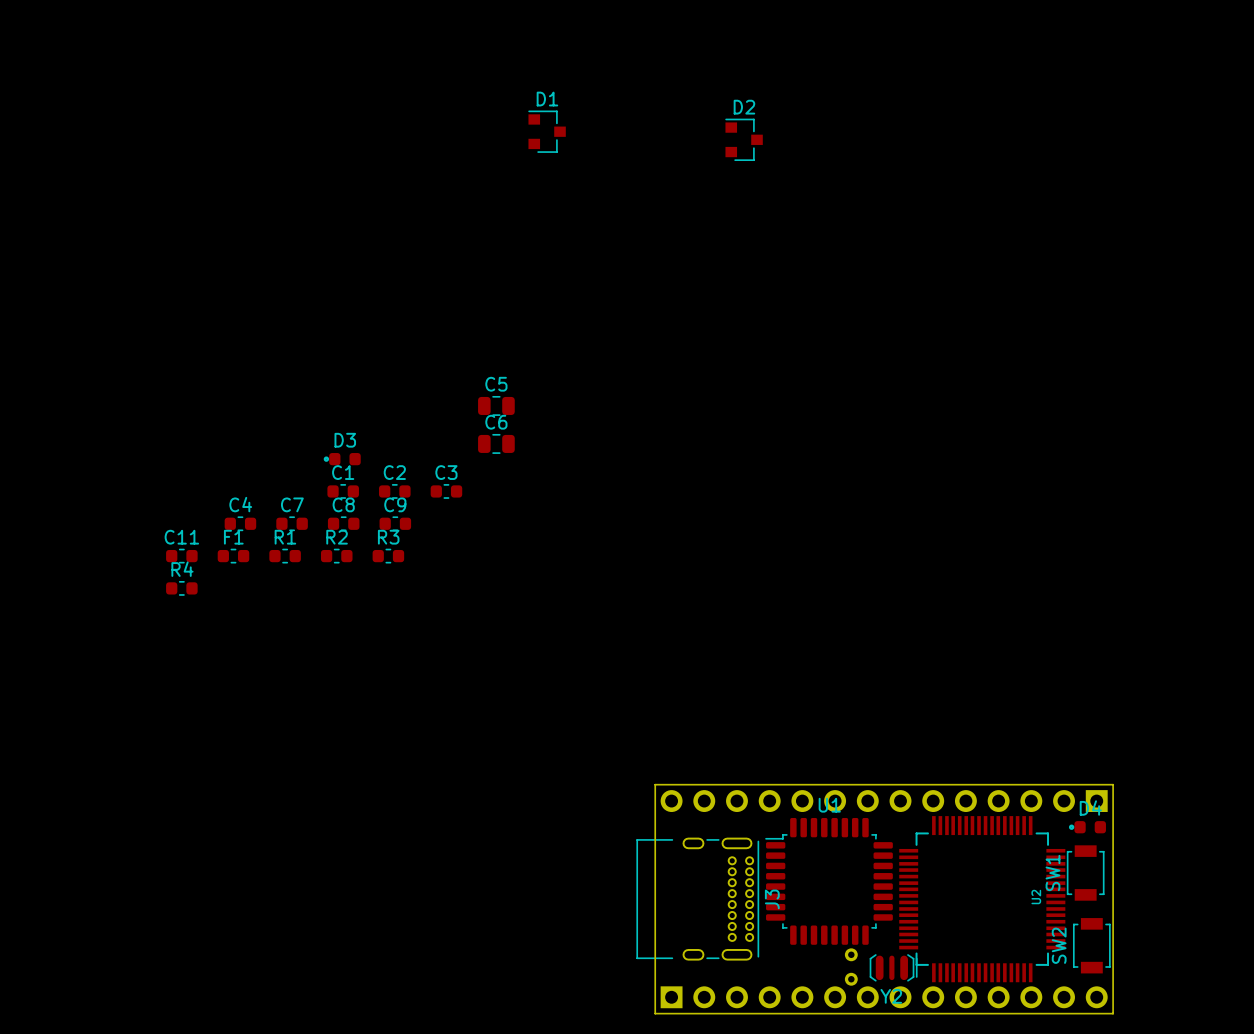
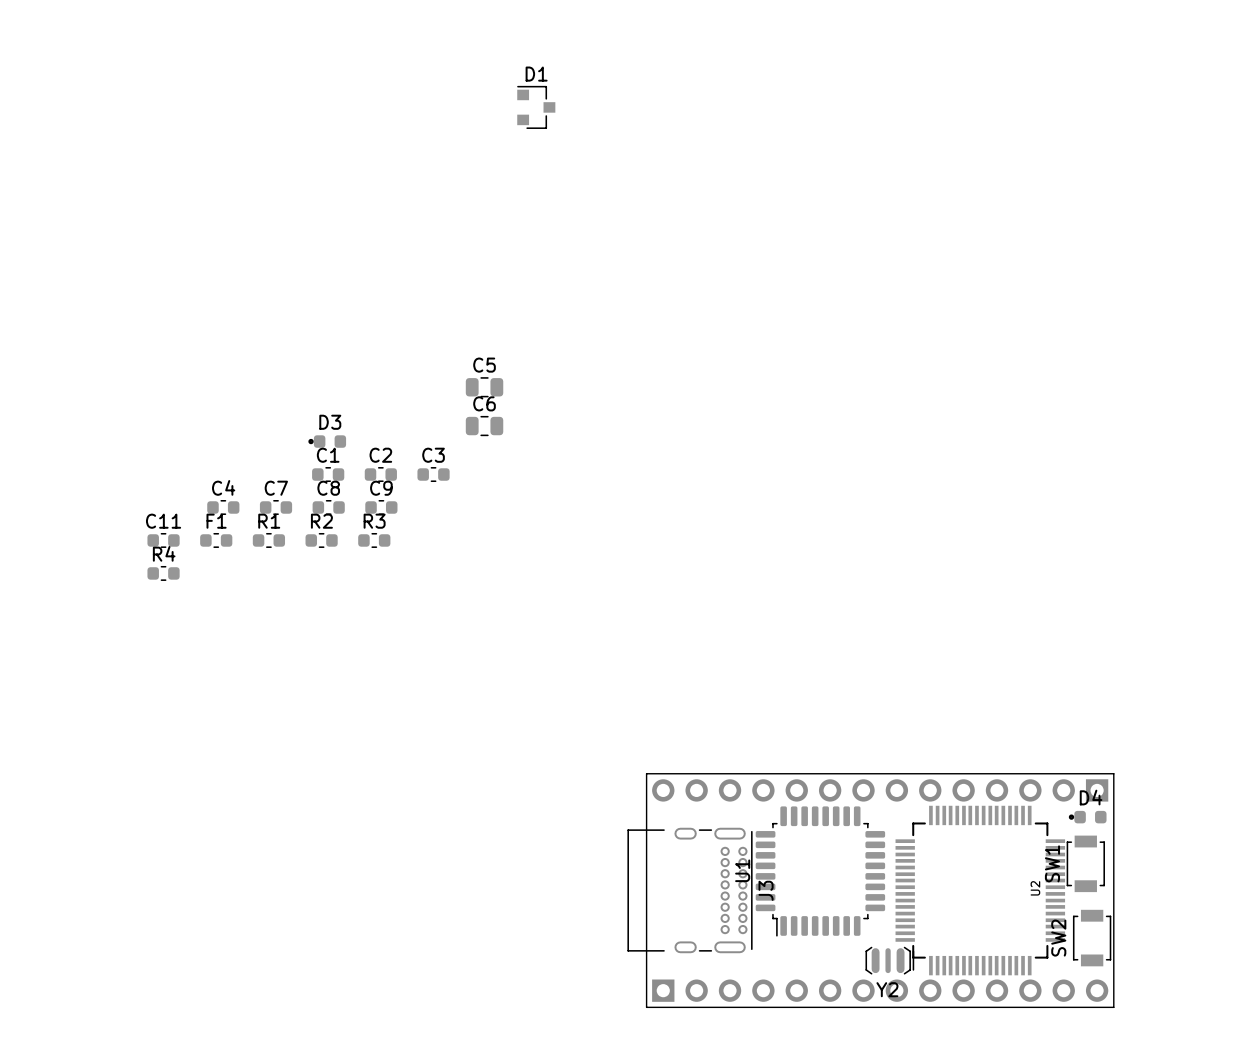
D2: (744, 139) -> none
U1 rotation: 0° (829, 881) -> 90° counterclockwise (820, 871)
part: (851, 967) -> none

